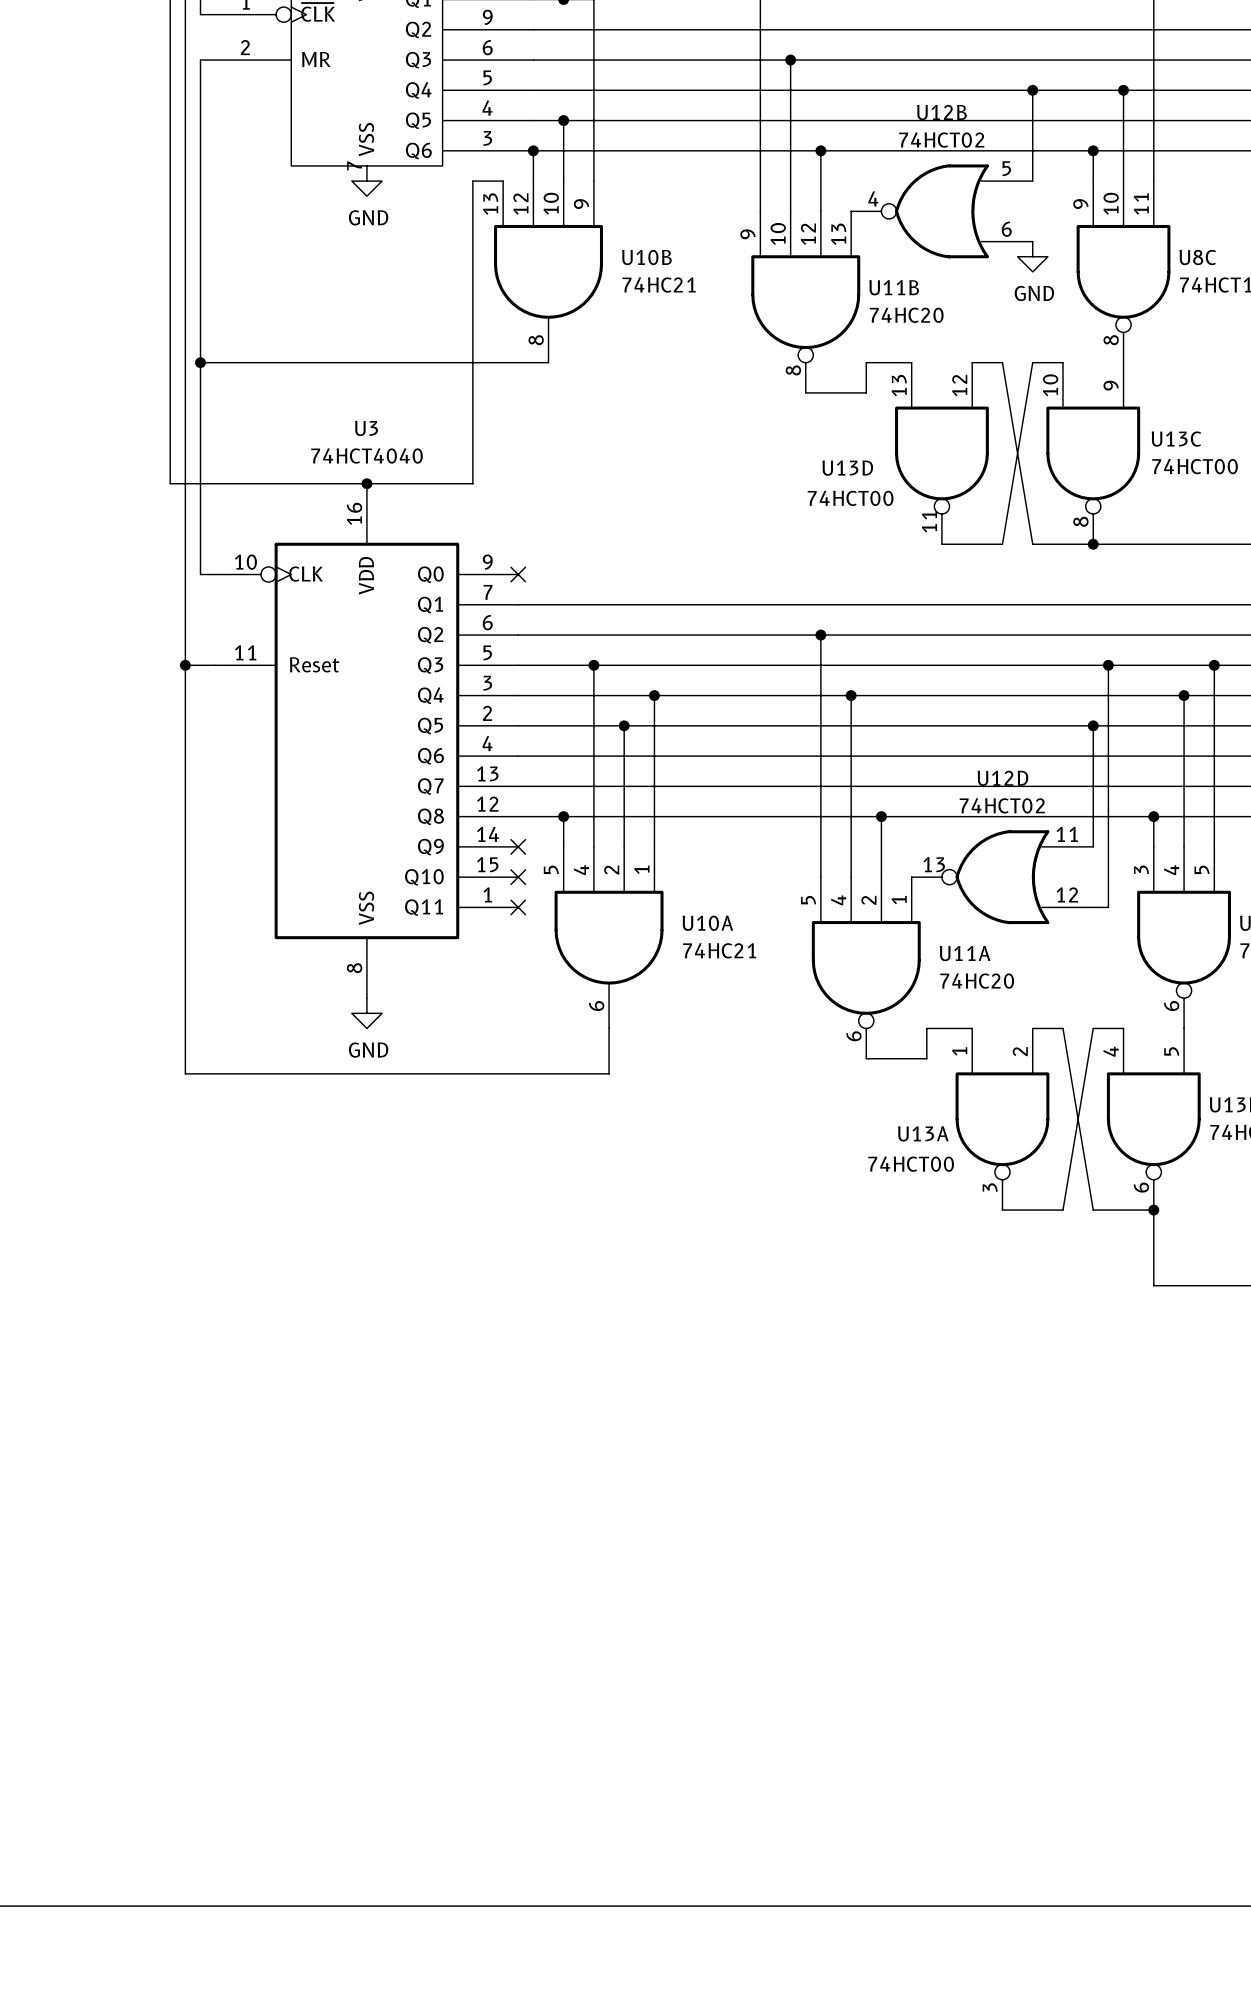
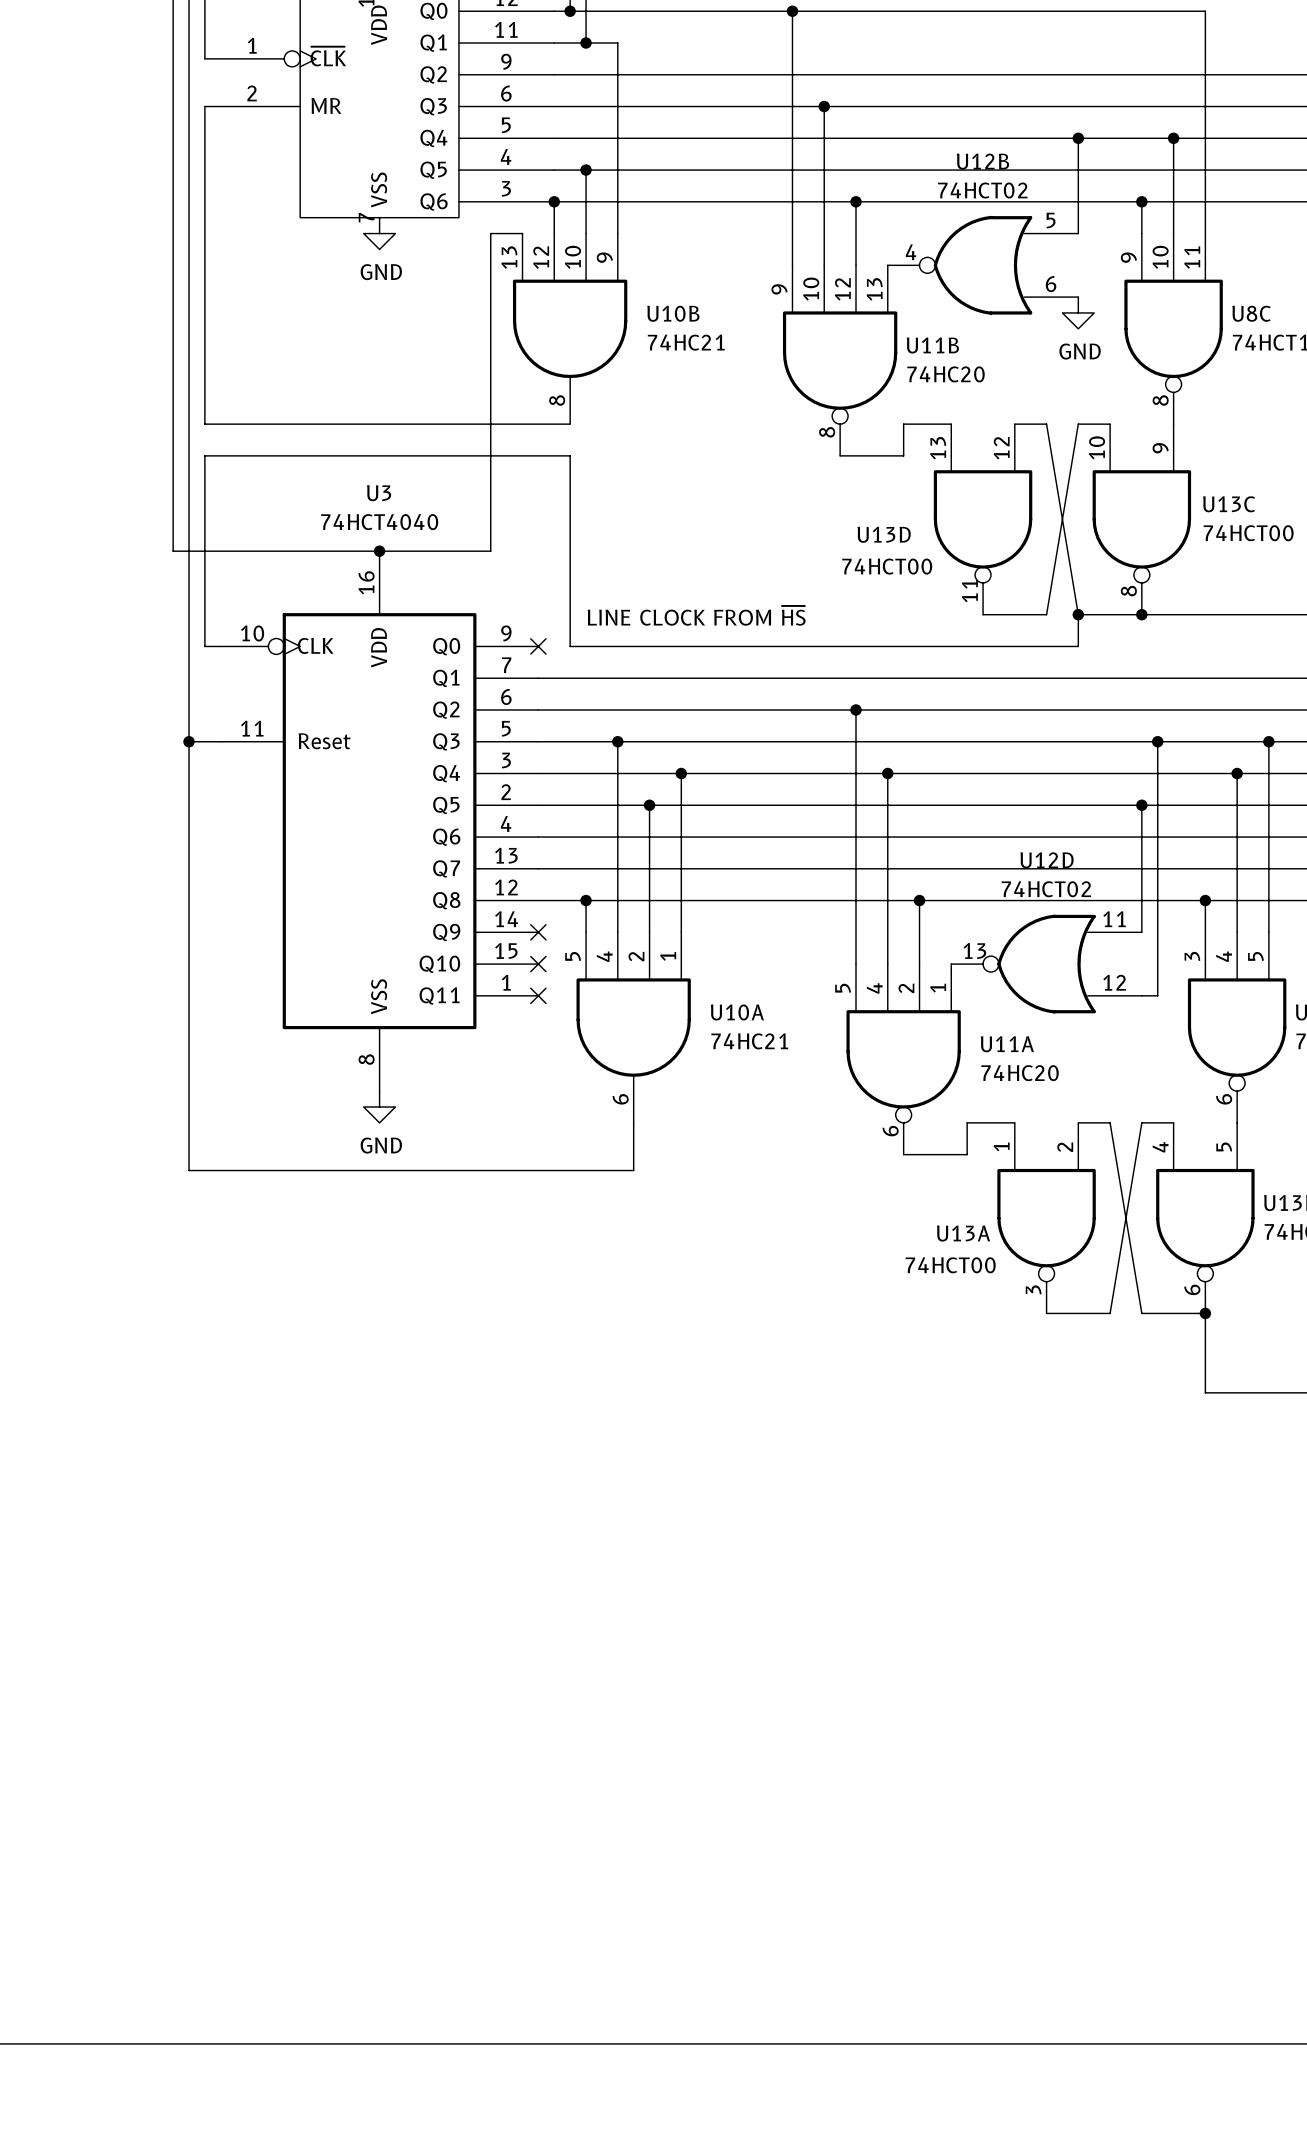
wire: (200, 362) (200, 392) -> (1078, 614) (1078, 646) (570, 646) (570, 455) (204, 455)
junction: (200, 362) -> none
junction: none -> (1078, 614)
text: none -> LINE CLOCK FROM ~{HS} (696, 615)

